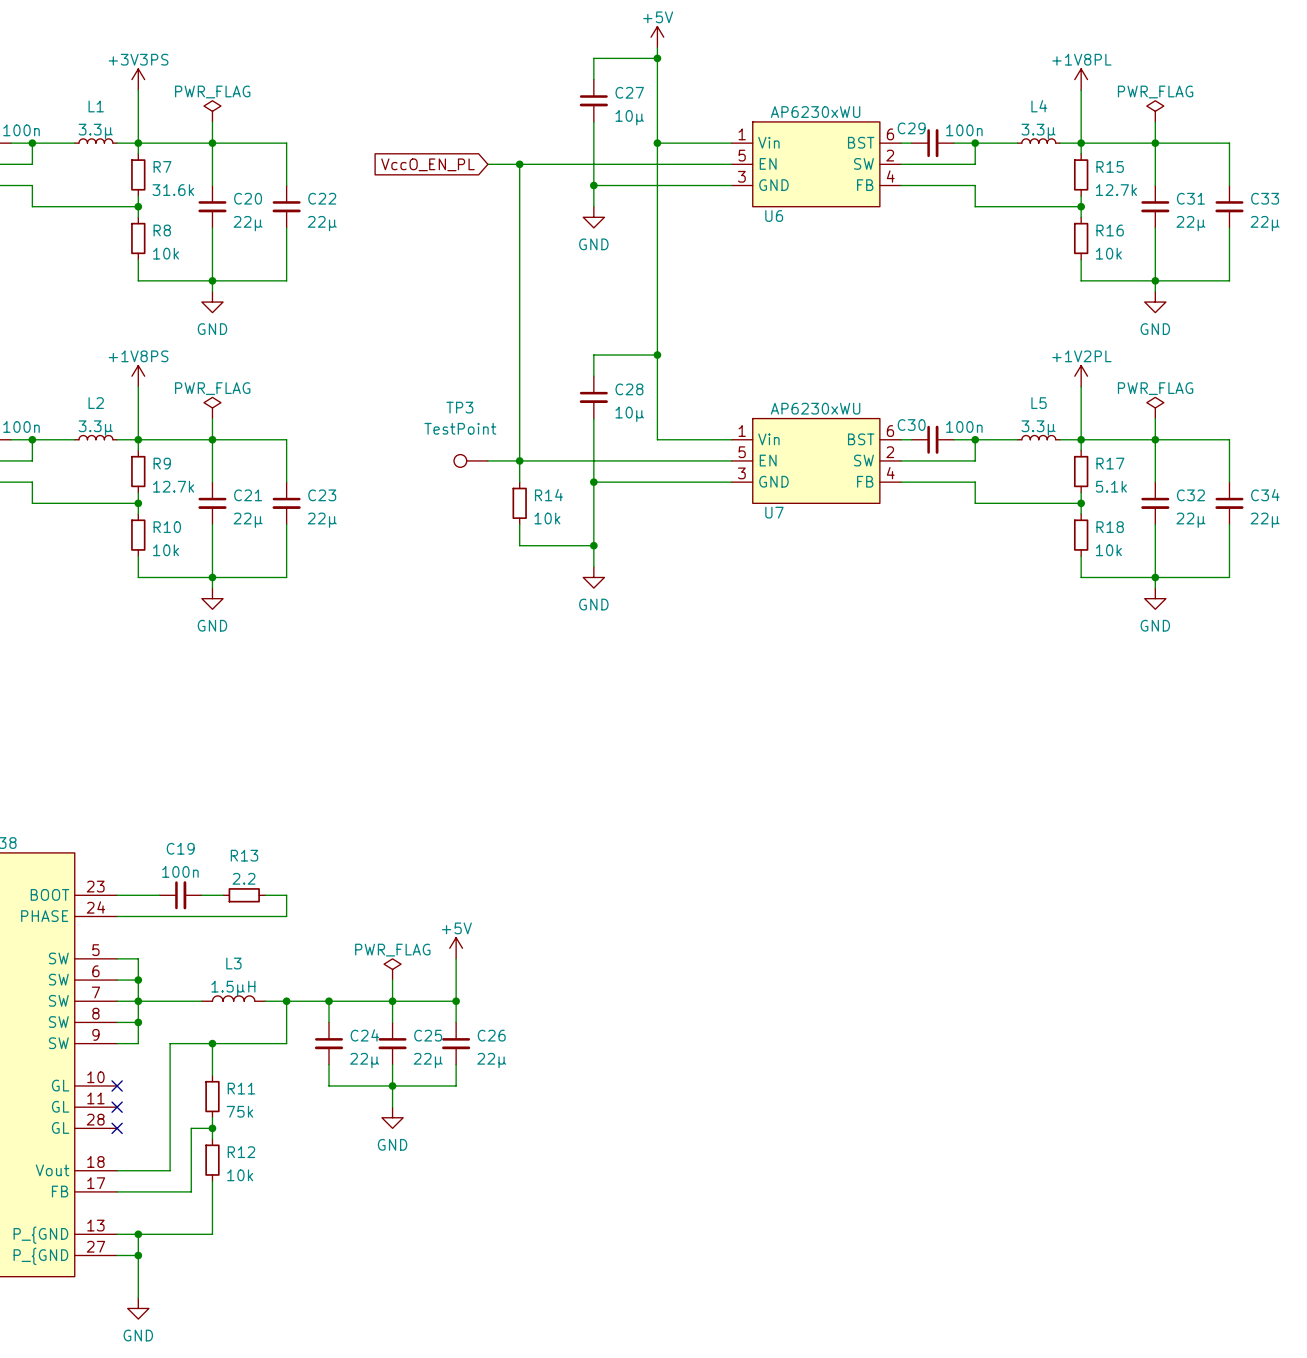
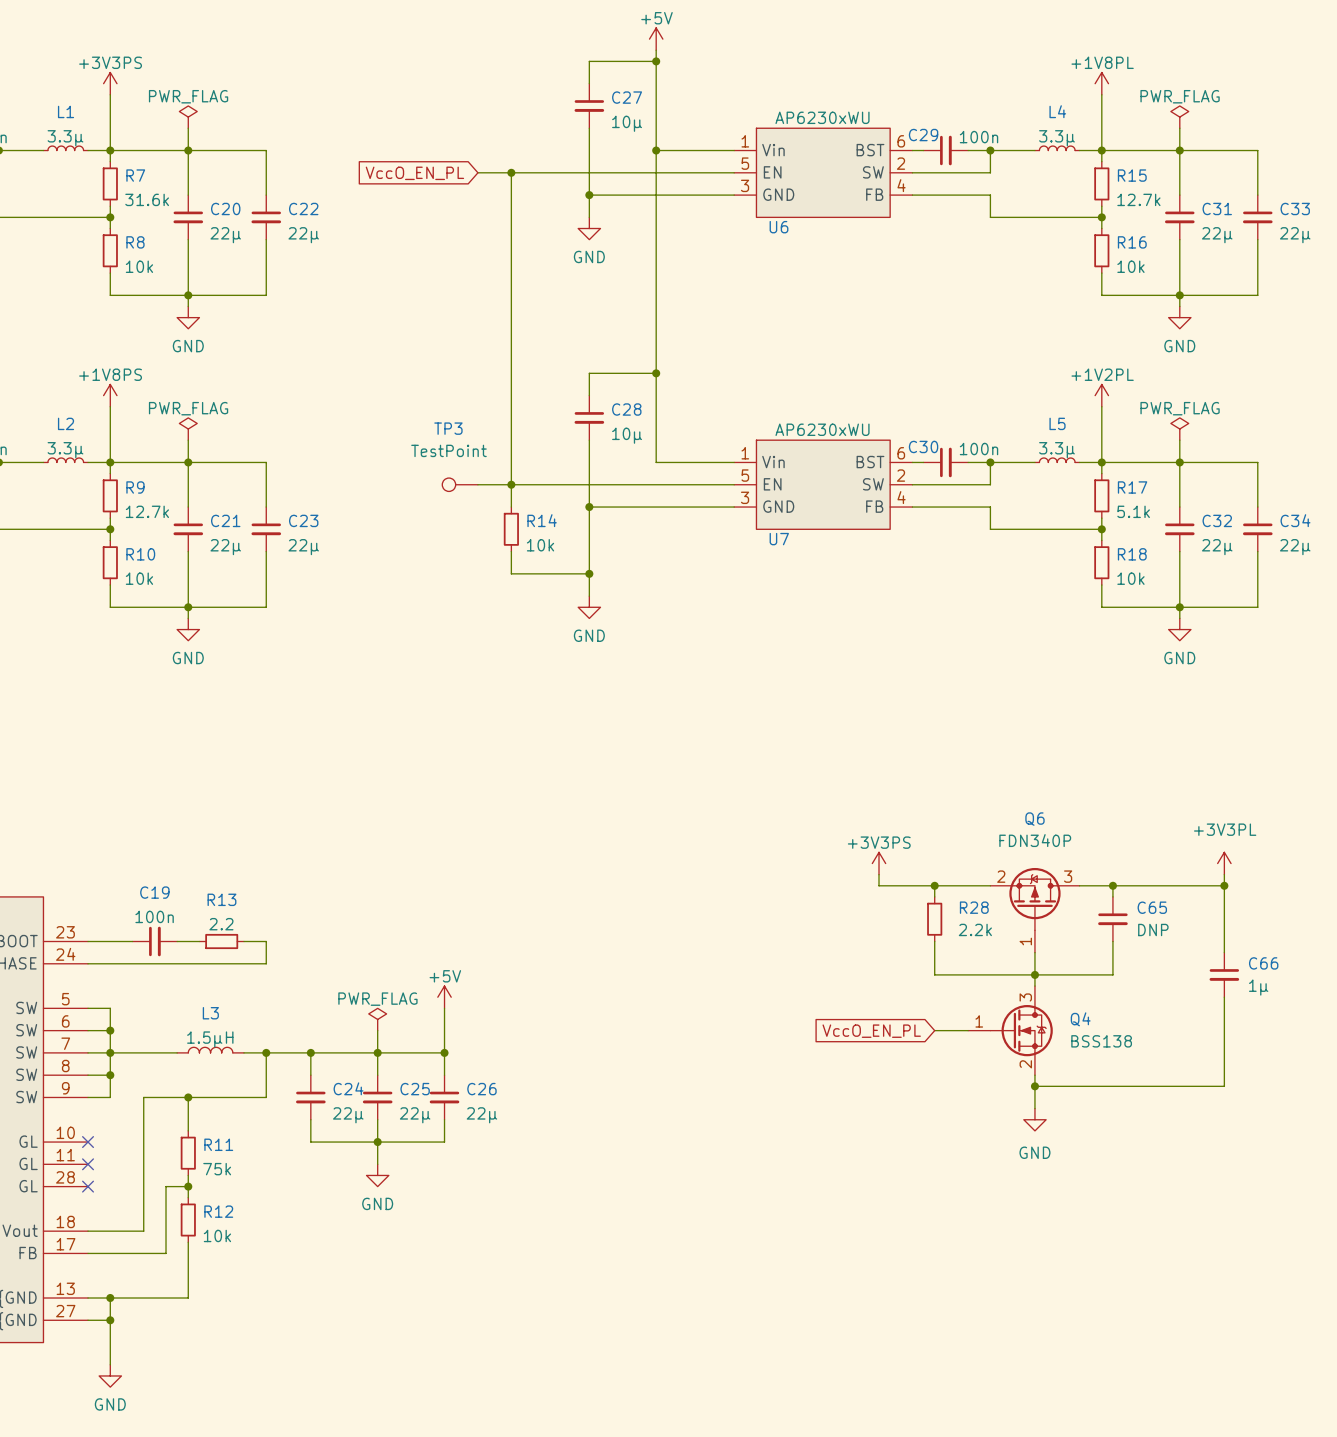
power symbol: none -> +3V3PS (879, 863)
power symbol: none -> +3V3PL (1224, 863)
wire: none -> (879, 874) (879, 885) (990, 885)
wire: none -> (1224, 874) (1224, 952)
wire: none -> (934, 885) (934, 896)
junction: none -> (934, 885)
wire: none -> (1079, 885) (1224, 885)
wire: none -> (1112, 885) (1112, 896)
junction: none -> (1112, 885)
junction: none -> (1224, 885)
Q6: none -> FDN340P (1034, 910)
R28: none -> 2.2k (934, 919)
C65: none -> DNP (1112, 919)
wire: none -> (934, 941) (934, 974) (1112, 974) (1112, 941)
wire: none -> (1034, 952) (1034, 986)
junction: none -> (1034, 974)
C66: none -> 1µ (1224, 974)
wire: none -> (1224, 997) (1224, 1086) (1034, 1086)
global label: none -> VccO_EN_PL (871, 1031)
wire: none -> (934, 1030) (968, 1030)
Q4: none -> BSS138 (1010, 1030)
wire: none -> (1034, 1075) (1034, 1108)
junction: none -> (1034, 1086)
power symbol: none -> GND (1034, 1119)

